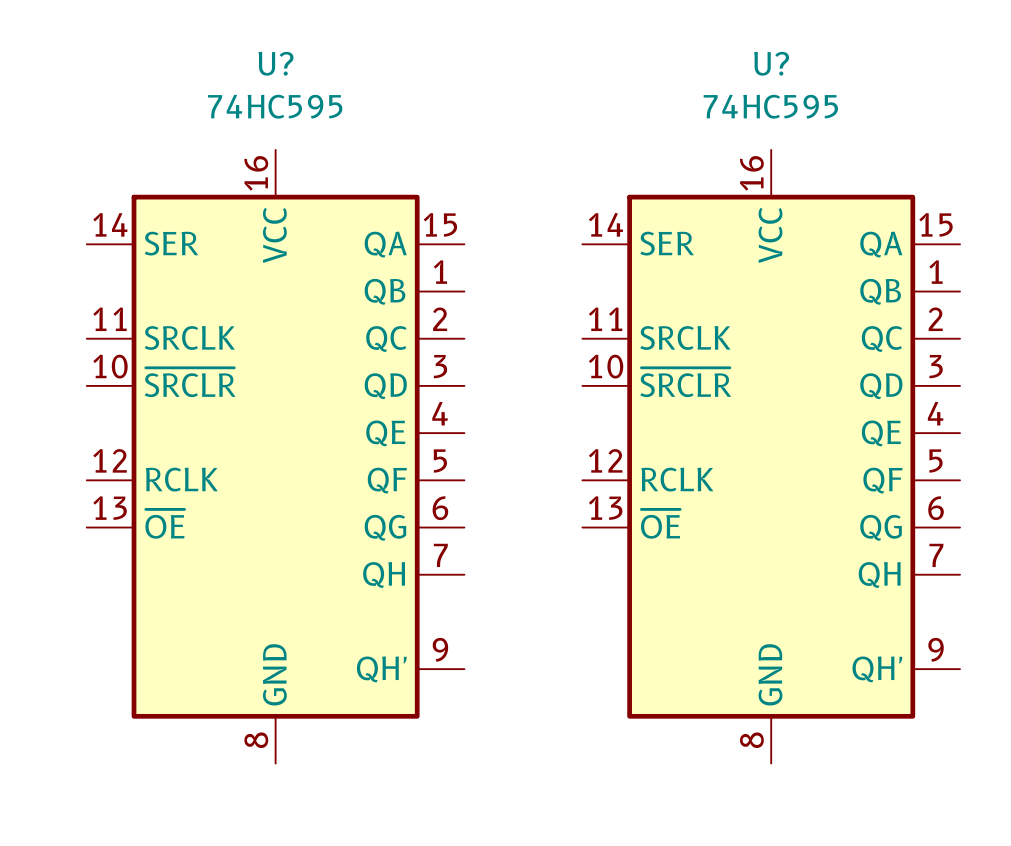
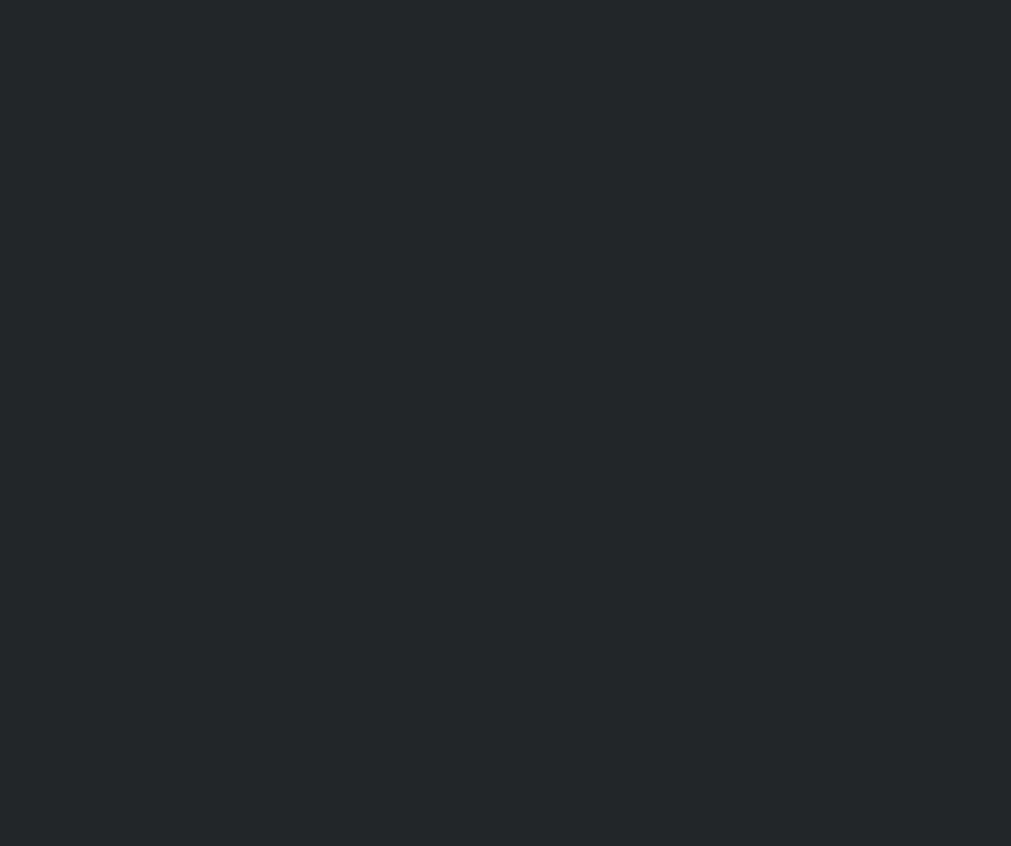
U?: 74HC595 (275, 456) -> none
U?: 74HC595 (771, 456) -> none

